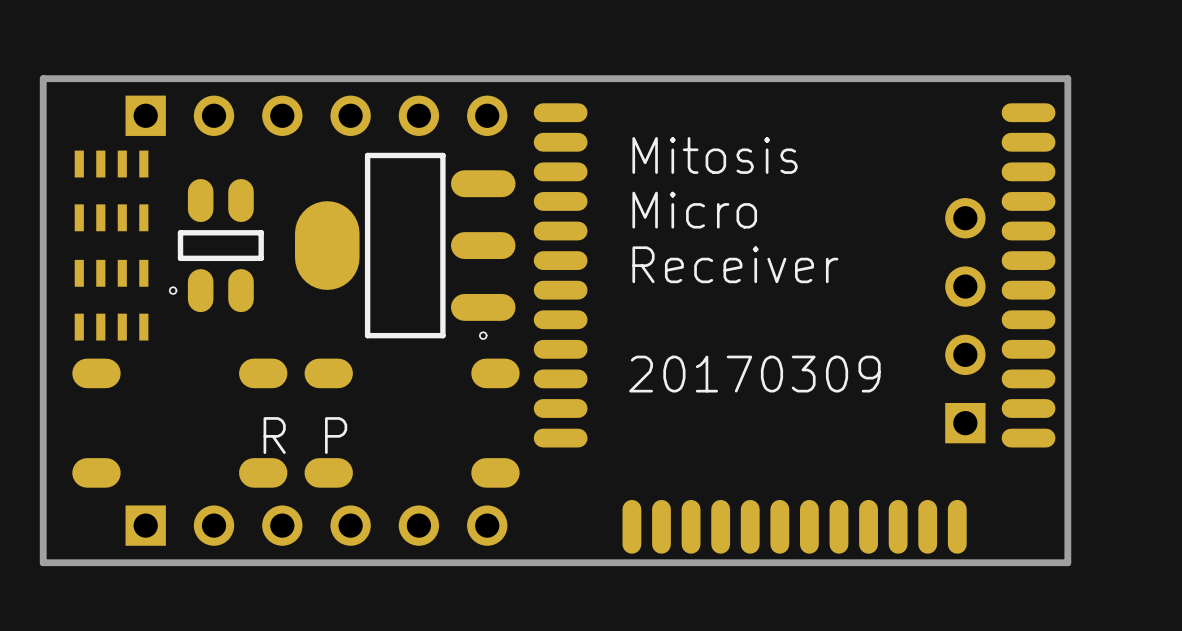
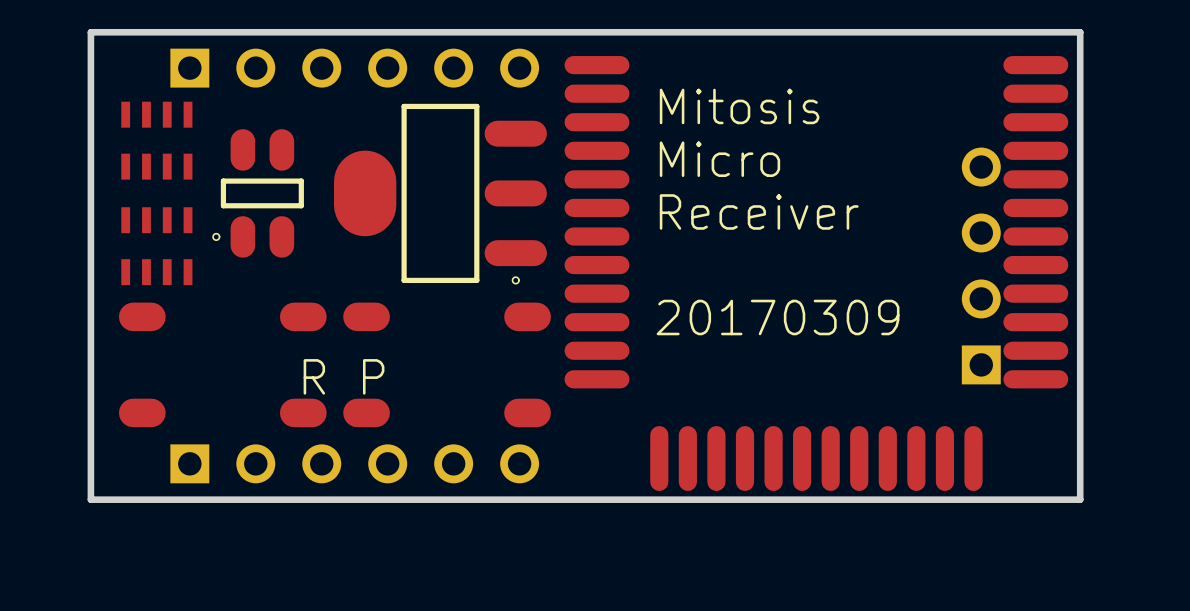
part footprint: [533, 103, 1056, 554] -> [564, 56, 1069, 491]

